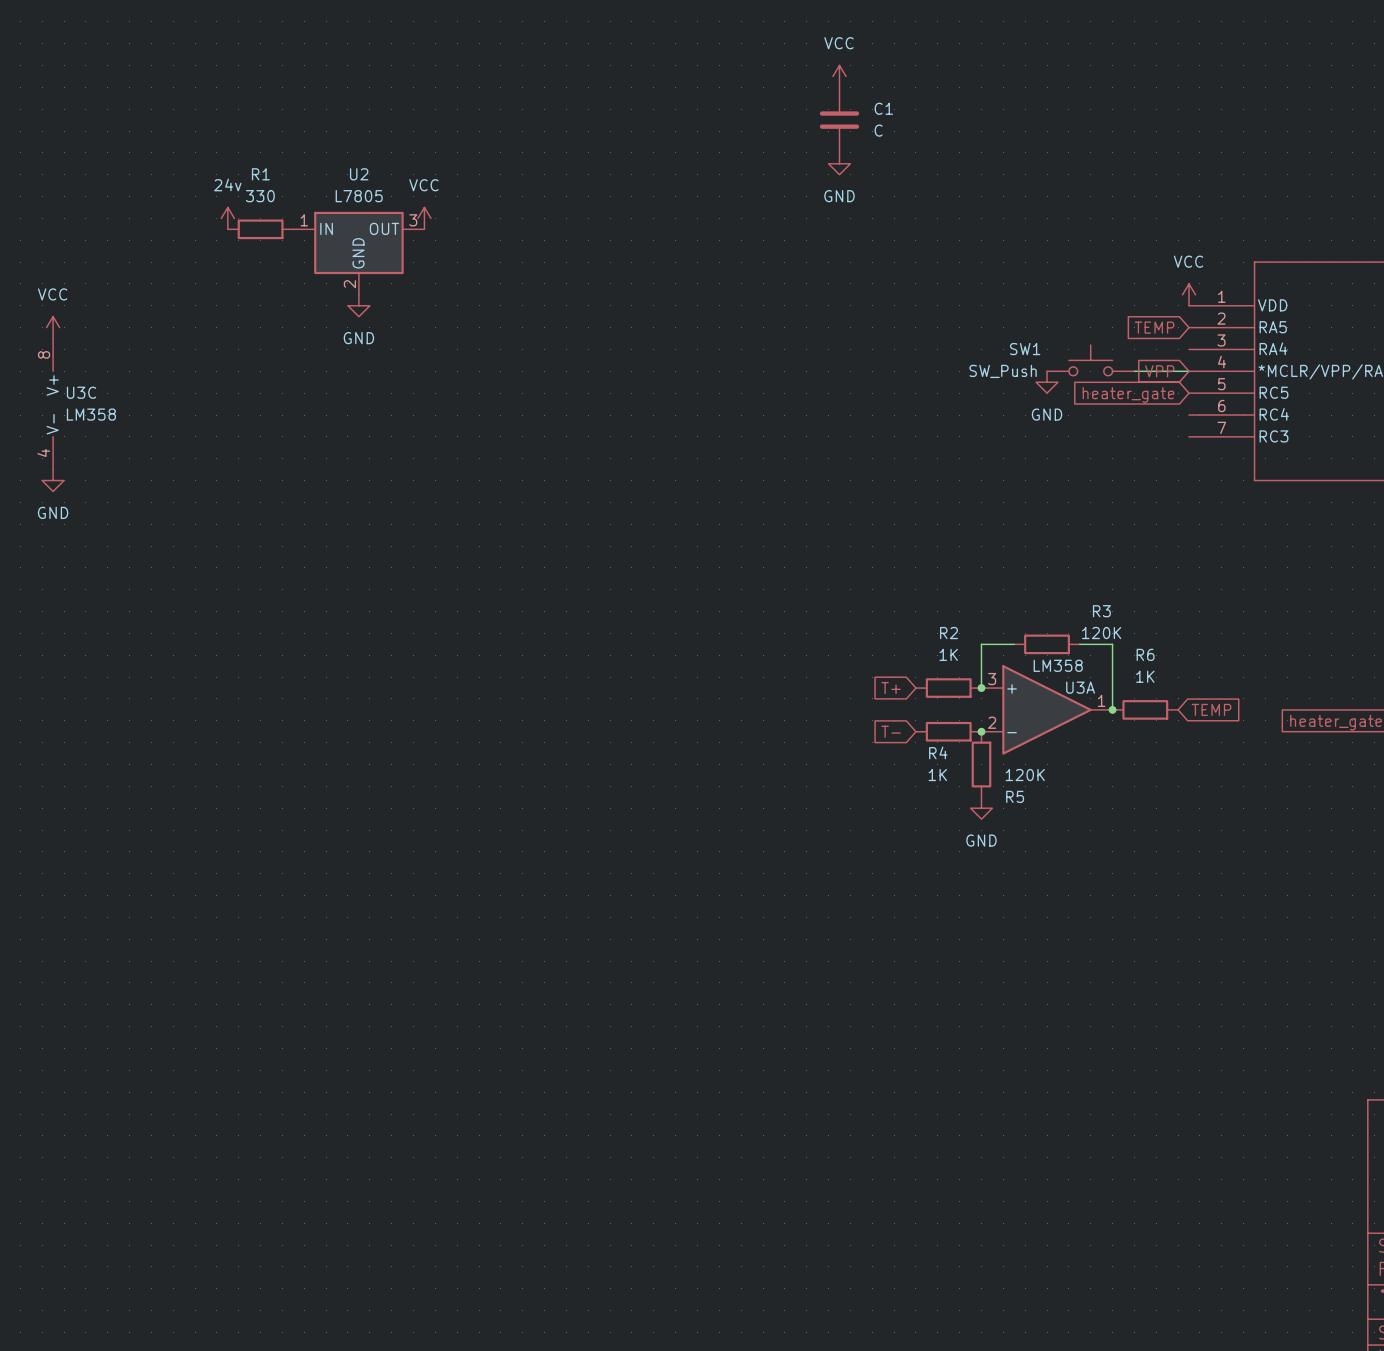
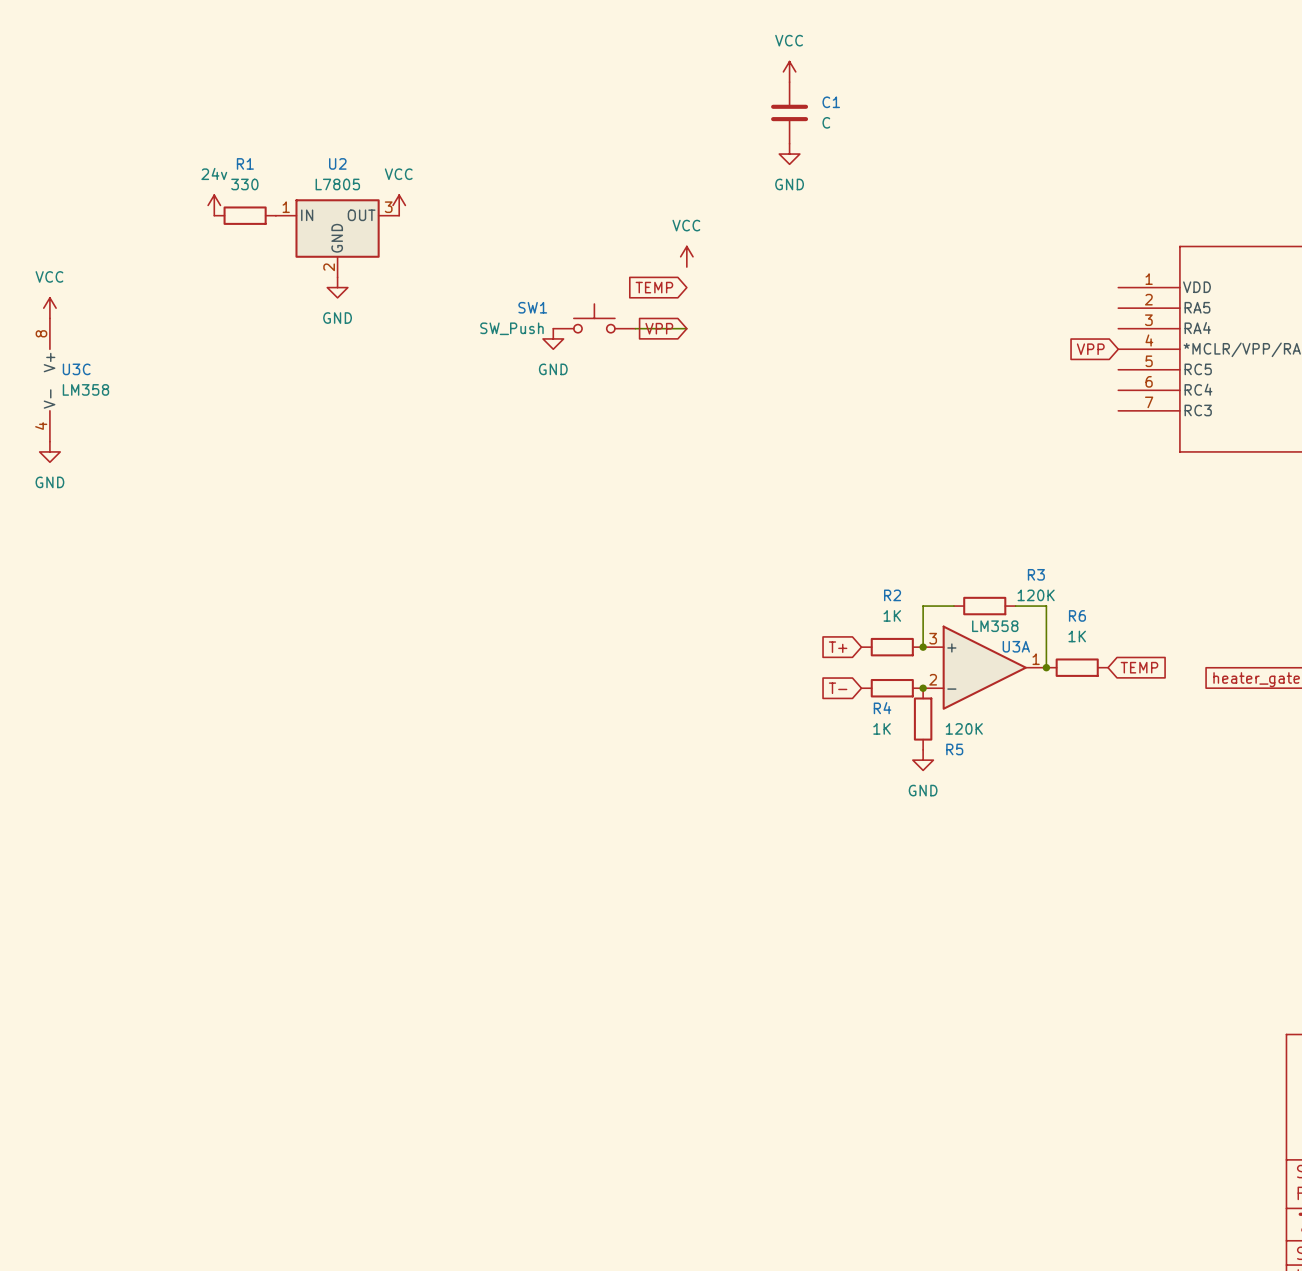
power symbol: none -> VCC (686, 256)
power symbol: VCC (1189, 294) -> none
global label: none -> TEMP (654, 287)
global label: TEMP (1154, 327) -> none
wire: none -> (635, 328) (686, 328)
global label: none -> VPP (659, 328)
power symbol: none -> GND (553, 338)
SW1 position: (1090, 360) -> (594, 318)
wire: (1134, 371) (1189, 371) -> none
power symbol: GND (1047, 382) -> none
global label: heater_gate (1128, 394) -> none

